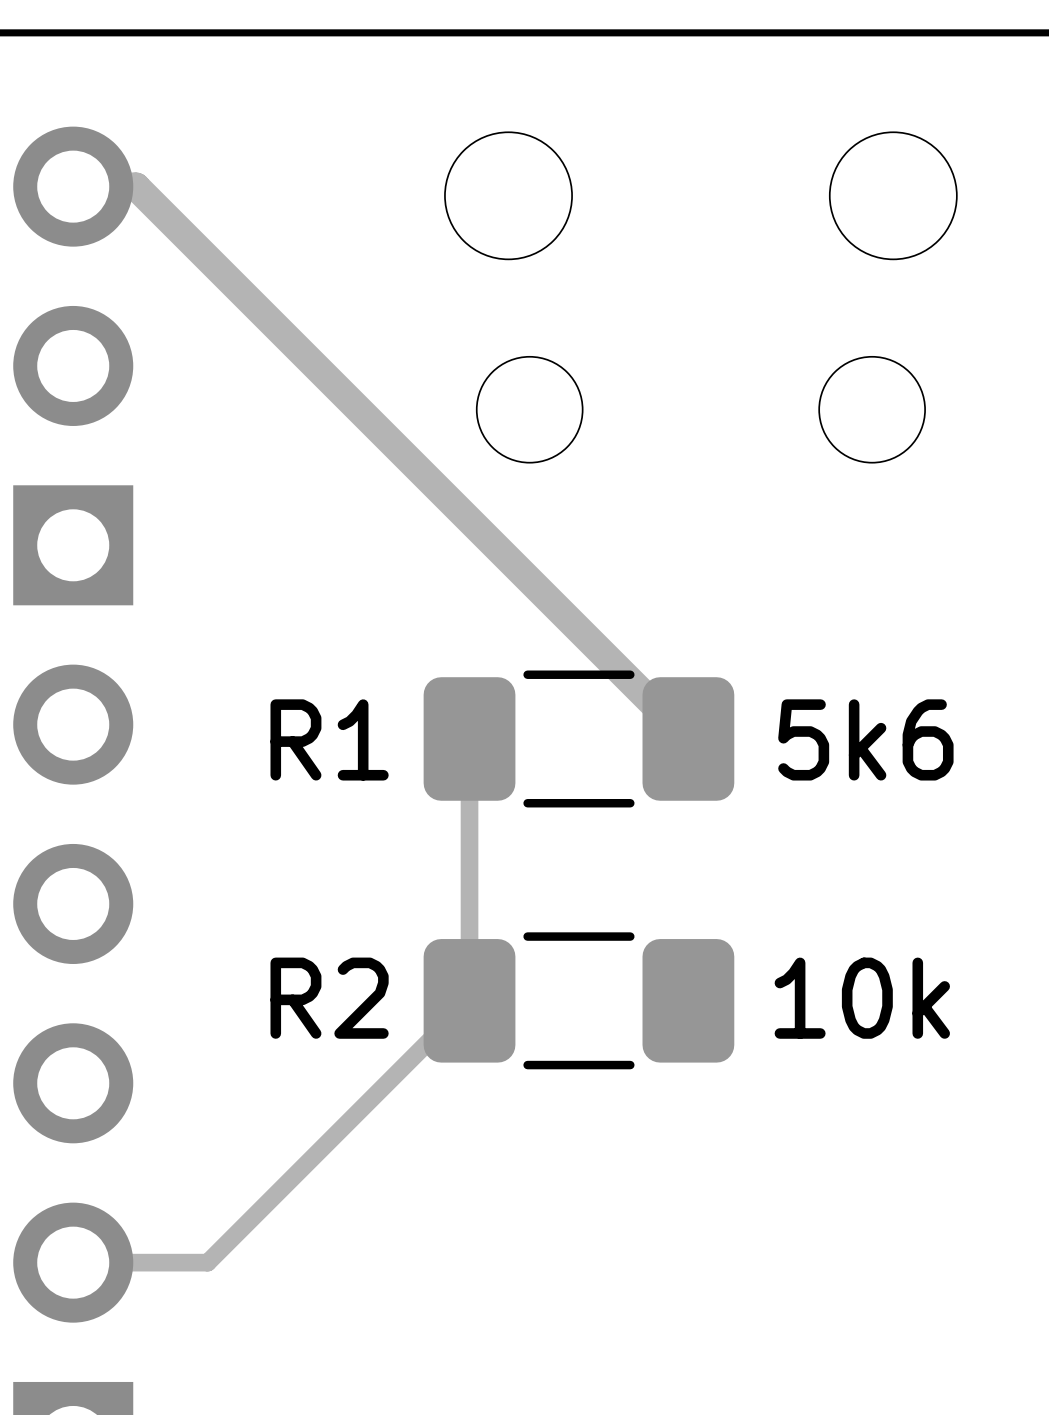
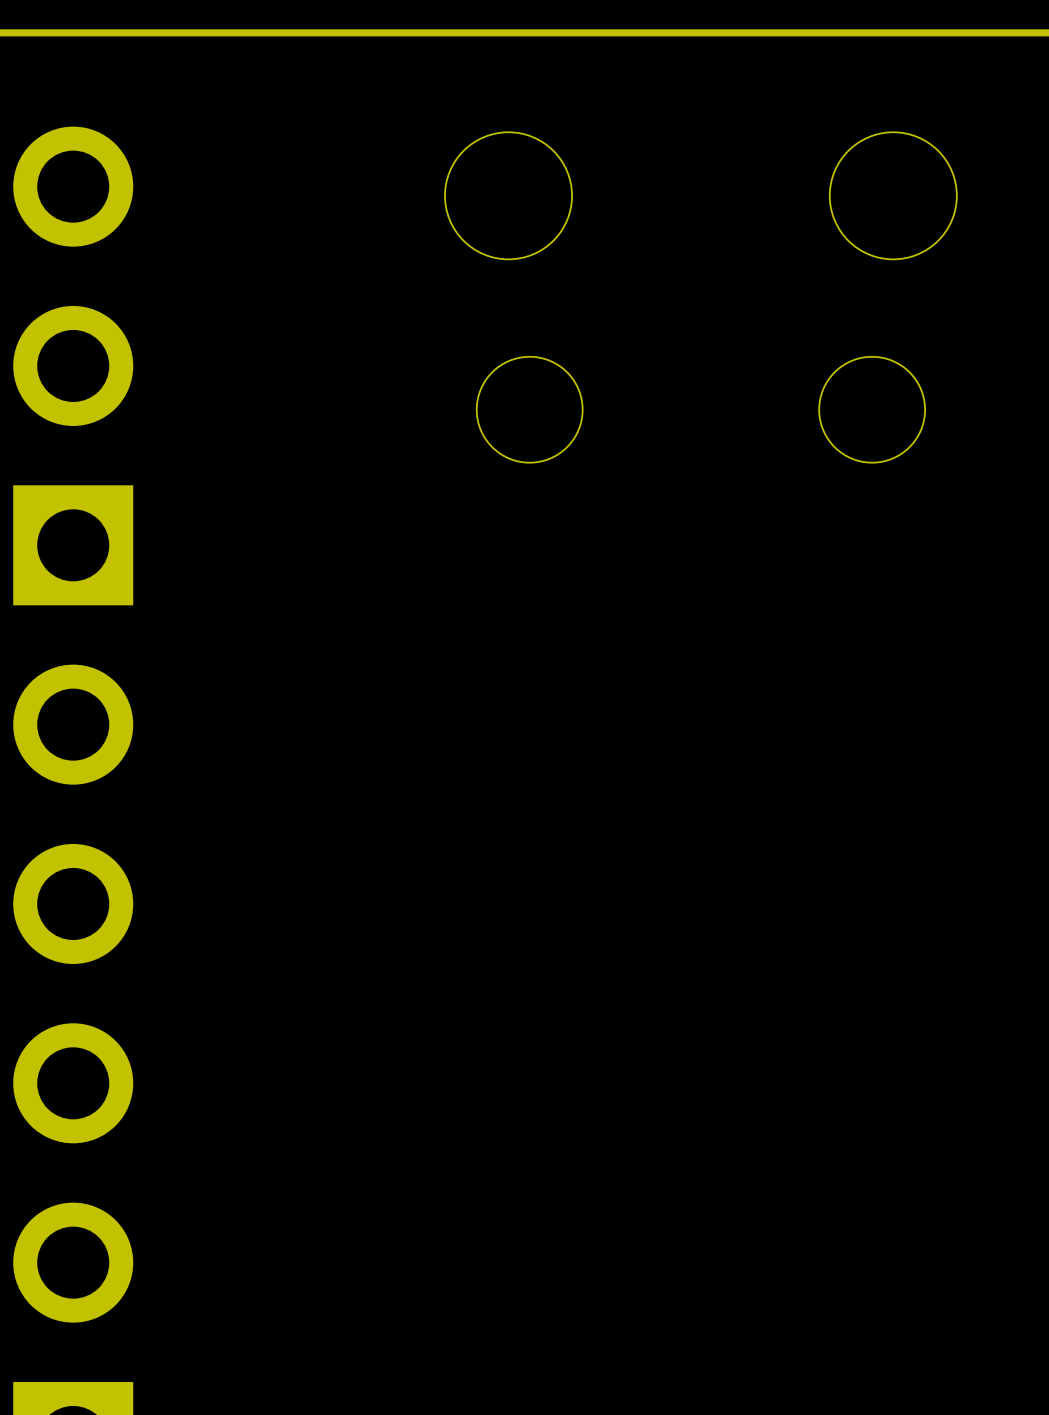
track: (73, 186) (136, 186) (688, 738) -> none
track: (469, 738) (469, 1000) (207, 1262) (73, 1262) -> none
R1: 5k6 (578, 738) -> none
R2: 10k (578, 1000) -> none

